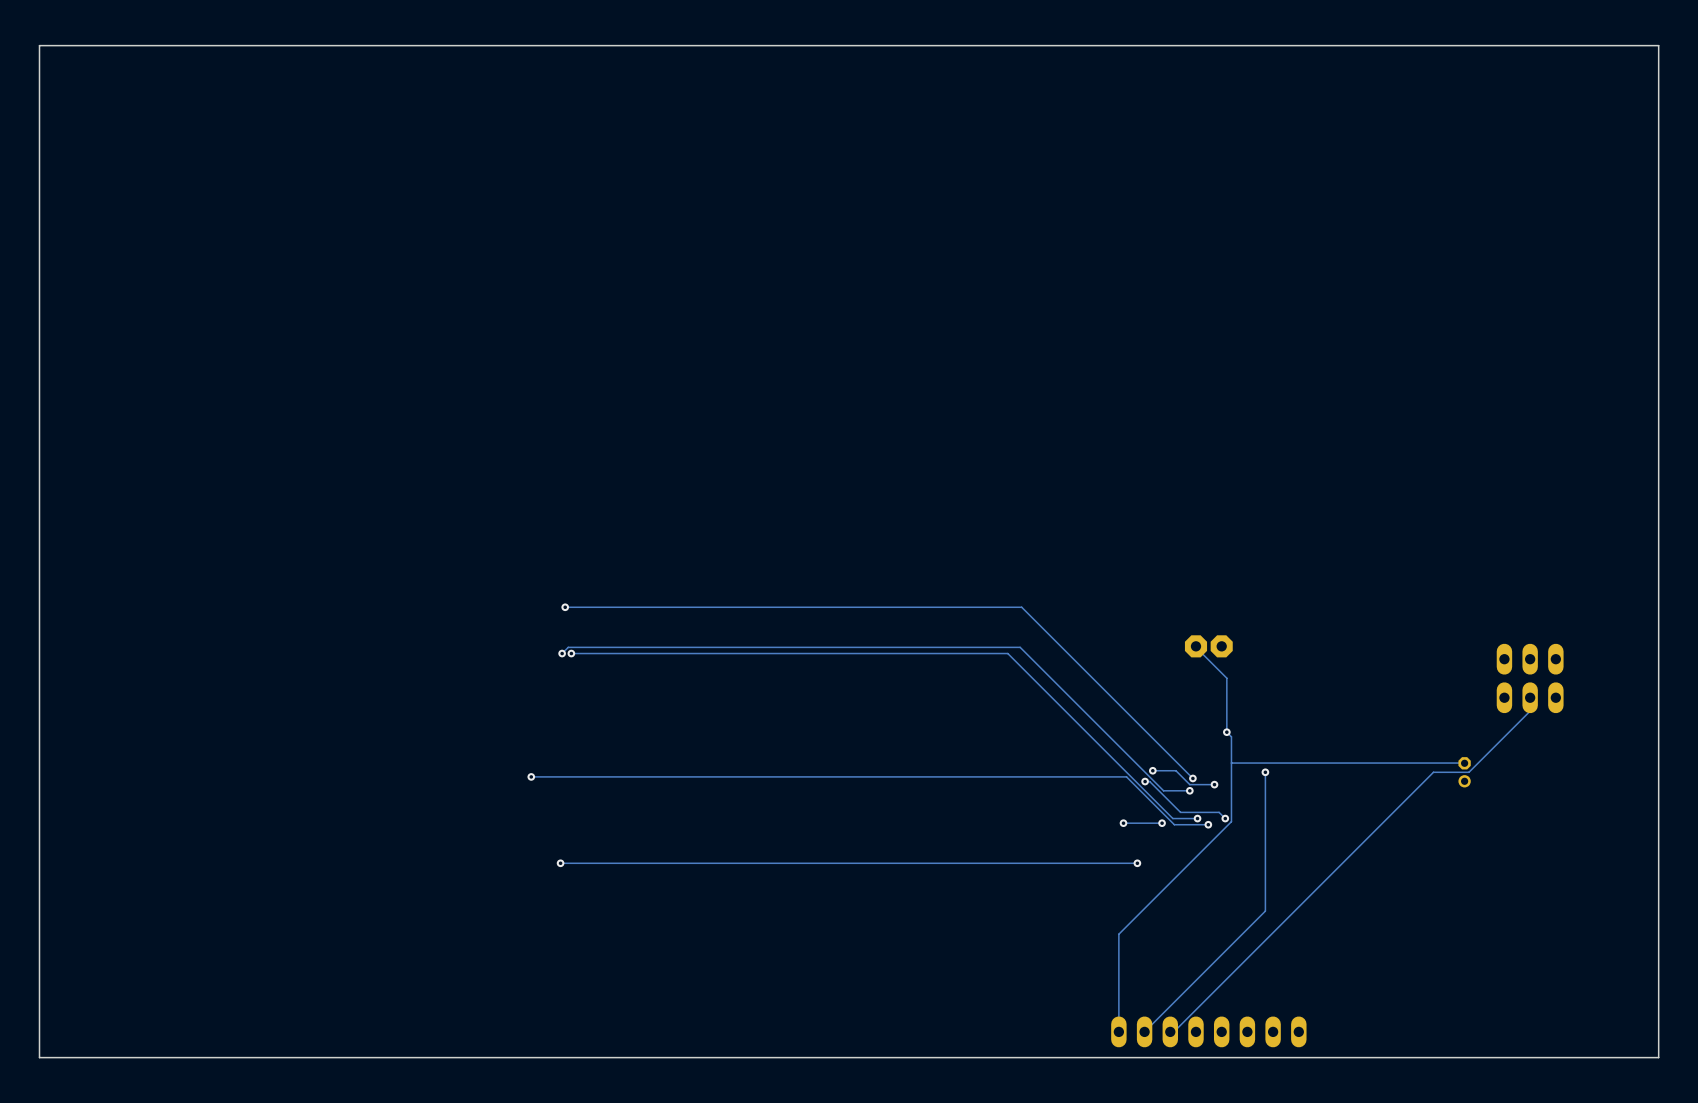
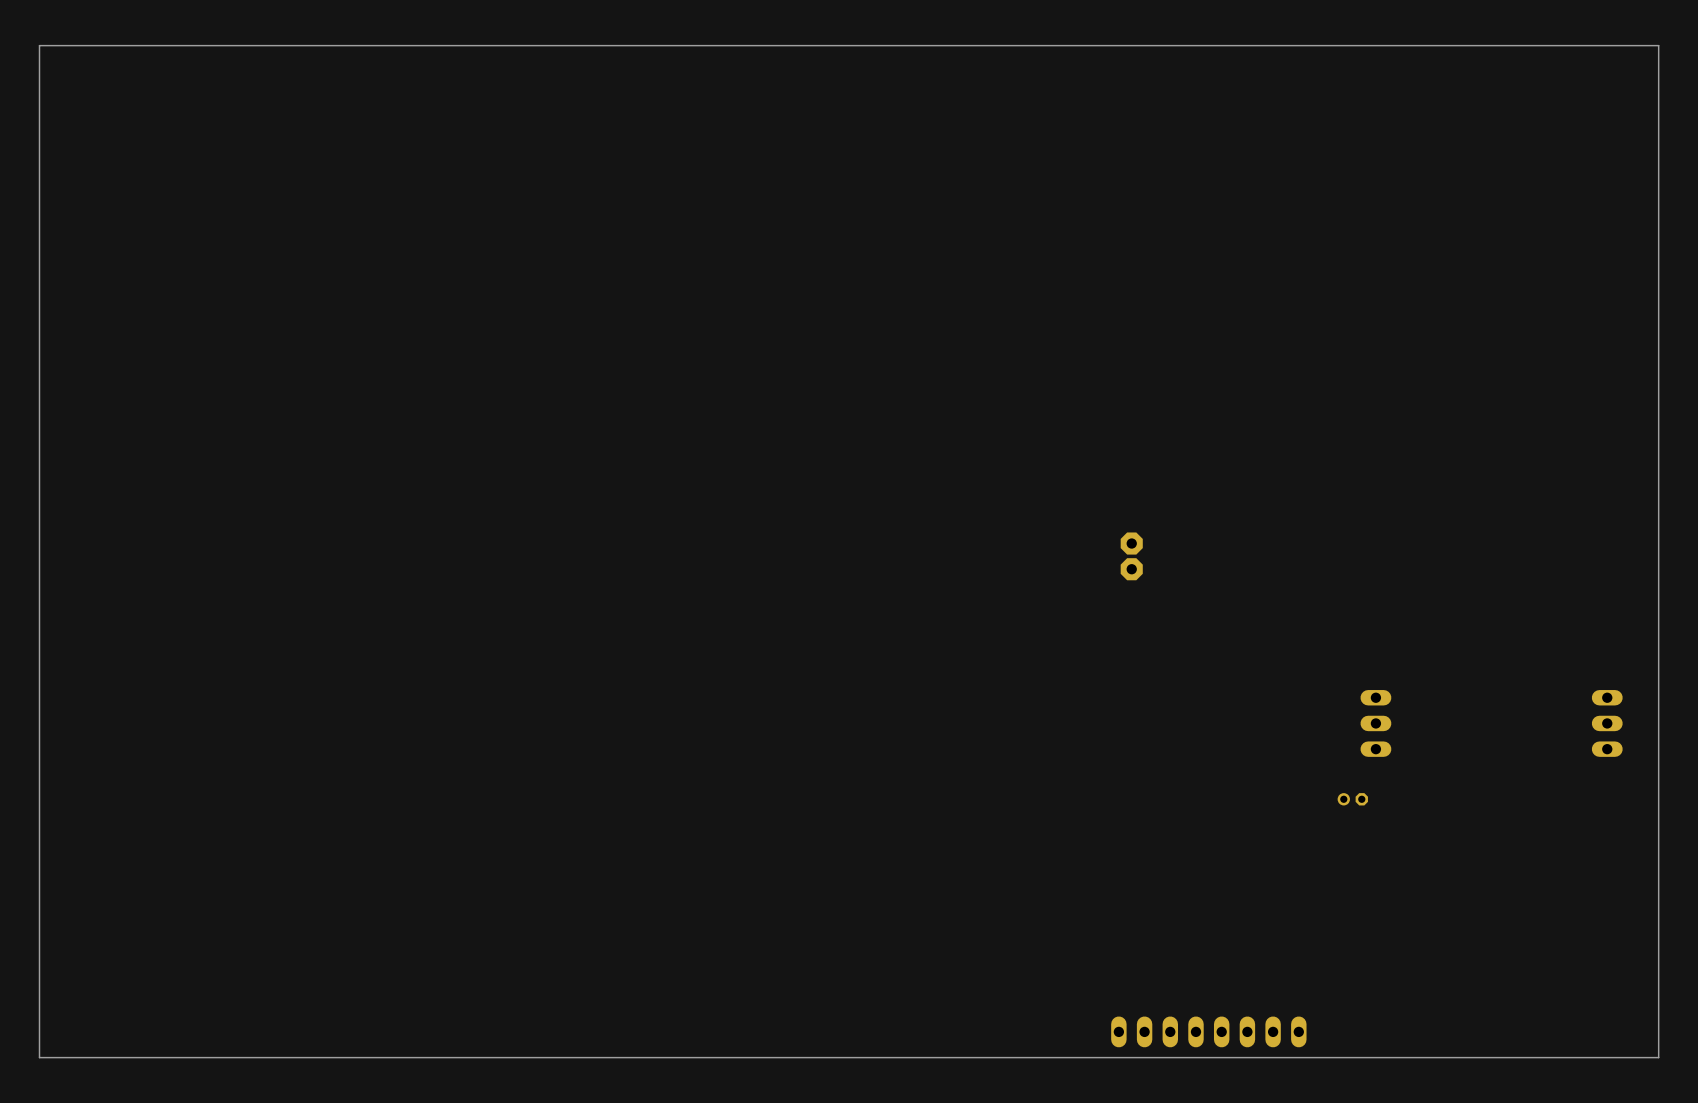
part: none -> (1131, 543)
part: none -> (1131, 569)
track: (565, 607) (1021, 607) (1192, 778) -> none
via: (565, 607) -> none
track: (1195, 646) (1226, 678) (1226, 732) (1231, 736) (1231, 821) (1118, 934) (1118, 1031) -> none
part: (1195, 646) -> none
part: (1221, 646) -> none
track: (562, 653) (568, 647) (1020, 647) (1163, 790) (1189, 790) -> none
via: (562, 653) -> none
track: (571, 653) (1007, 653) (1172, 818) (1197, 818) -> none
via: (571, 653) -> none
part: (1530, 659) -> none
track: (1530, 697) (1529, 712) (1468, 772) (1433, 772) (1174, 1031) (1170, 1031) -> none
part: (1530, 697) -> none
part: none -> (1375, 723)
part: none -> (1607, 723)
via: (1226, 732) -> none
track: (1231, 763) (1464, 763) -> none
track: (1152, 770) (1175, 770) (1189, 784) (1214, 784) -> none
via: (1152, 770) -> none
track: (1265, 772) (1265, 911) (1144, 1031) -> none
via: (1265, 772) -> none
part rotation: 0° (1464, 772) -> 90° clockwise (1352, 799)
part position: (1464, 772) -> (1352, 799)
track: (531, 776) (1126, 776) (1174, 824) (1208, 824) -> none
via: (531, 776) -> none
via: (1192, 778) -> none
track: (1145, 781) (1149, 781) (1180, 812) (1219, 812) (1225, 818) -> none
via: (1145, 781) -> none
via: (1214, 784) -> none
via: (1189, 790) -> none
via: (1197, 818) -> none
via: (1225, 818) -> none
via: (1123, 823) -> none
track: (1162, 823) (1123, 823) -> none
via: (1162, 823) -> none
via: (1208, 824) -> none
via: (560, 863) -> none
track: (1137, 863) (560, 863) -> none
via: (1137, 863) -> none

